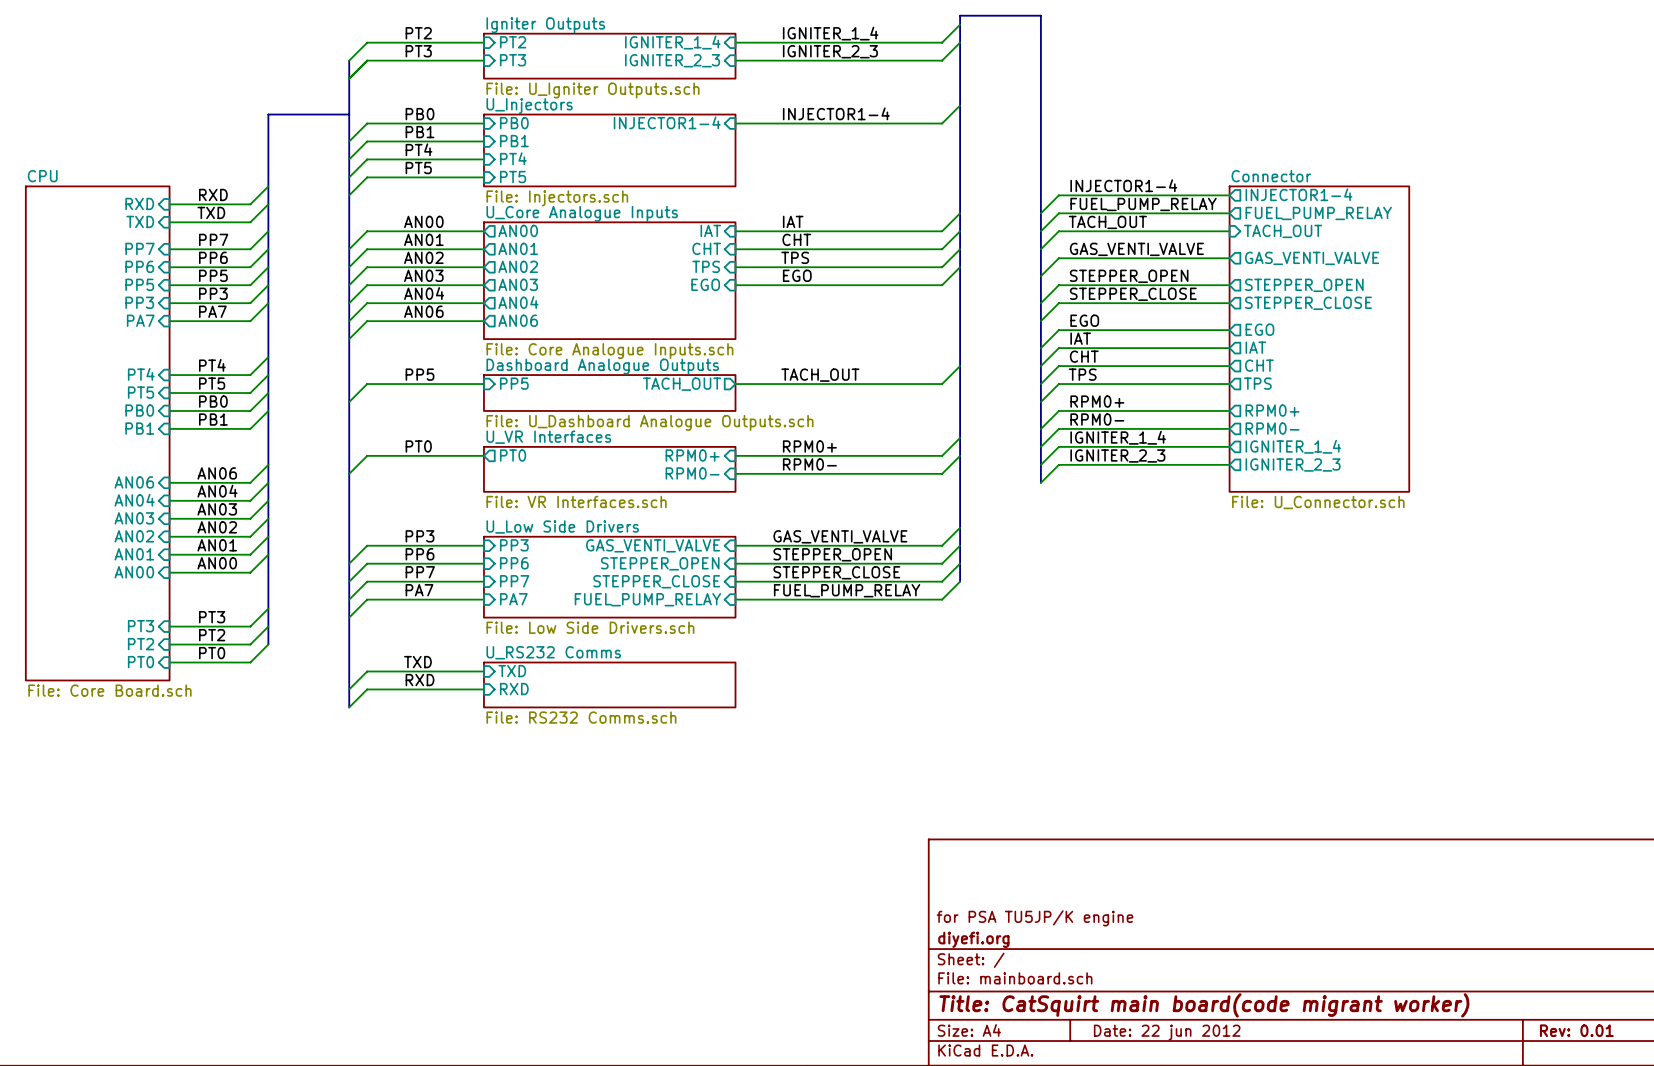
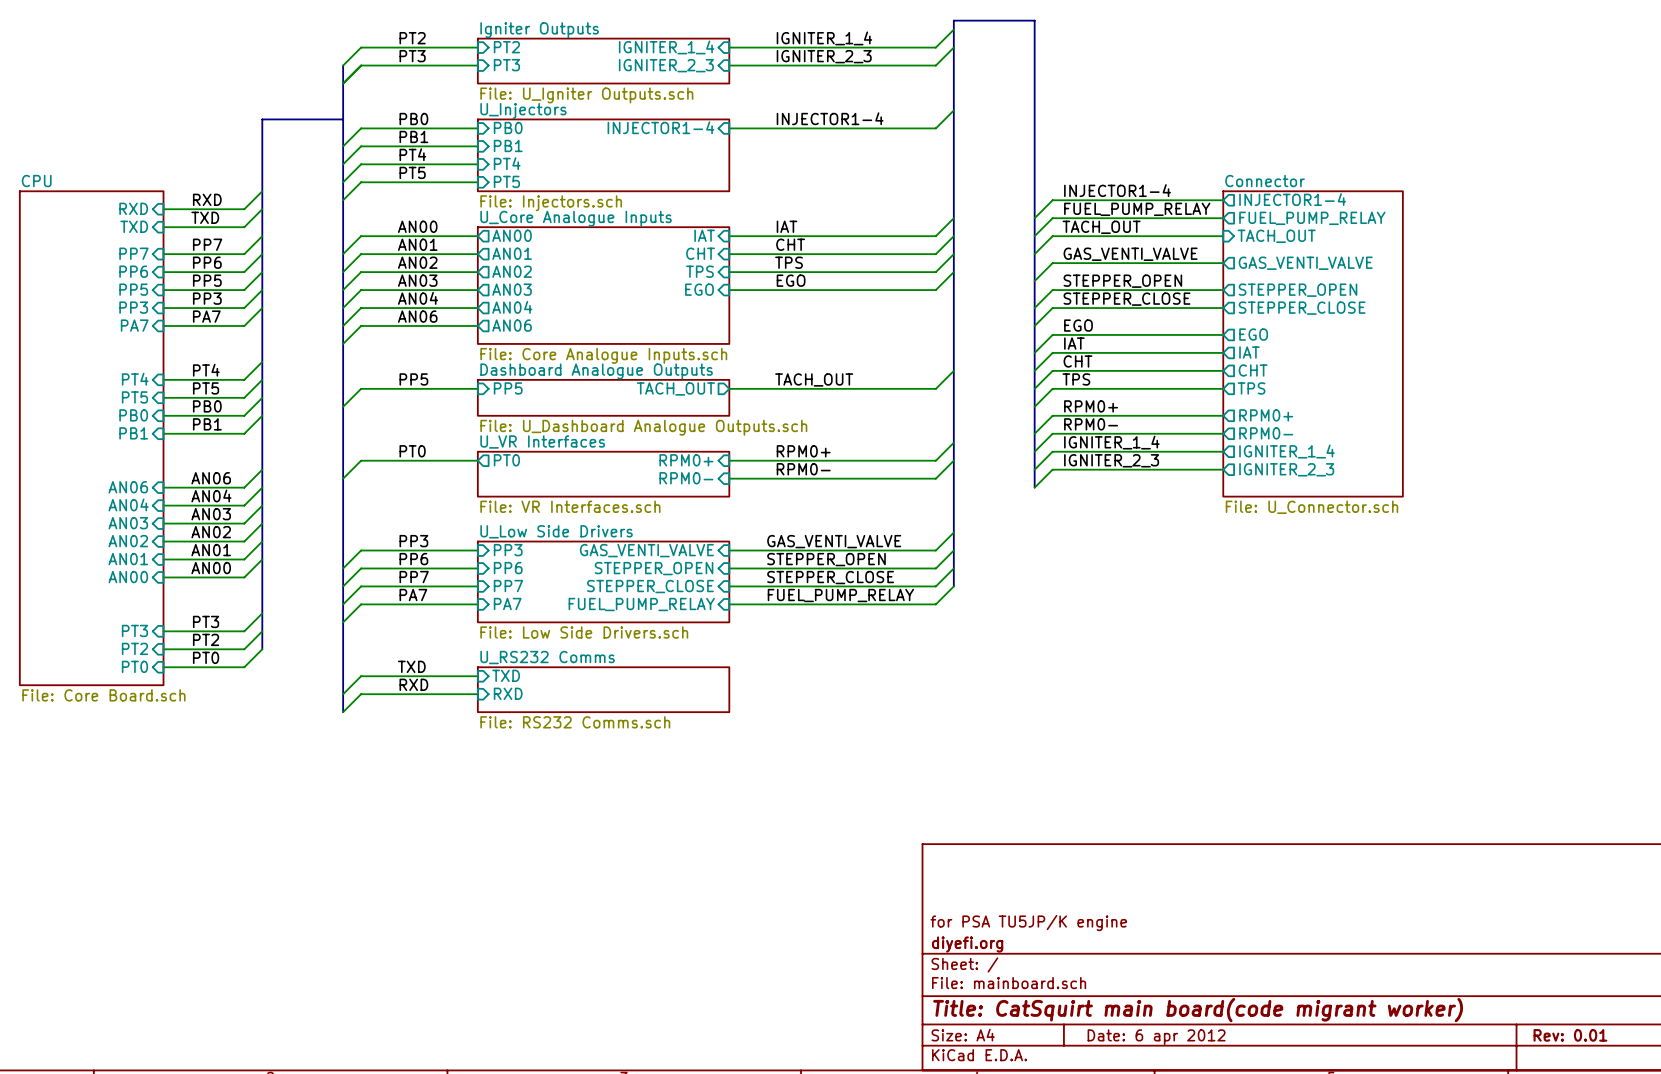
title block: Date: 22 jun 2012 (1167, 1032) -> Date: 6 apr 2012 (1156, 1037)

